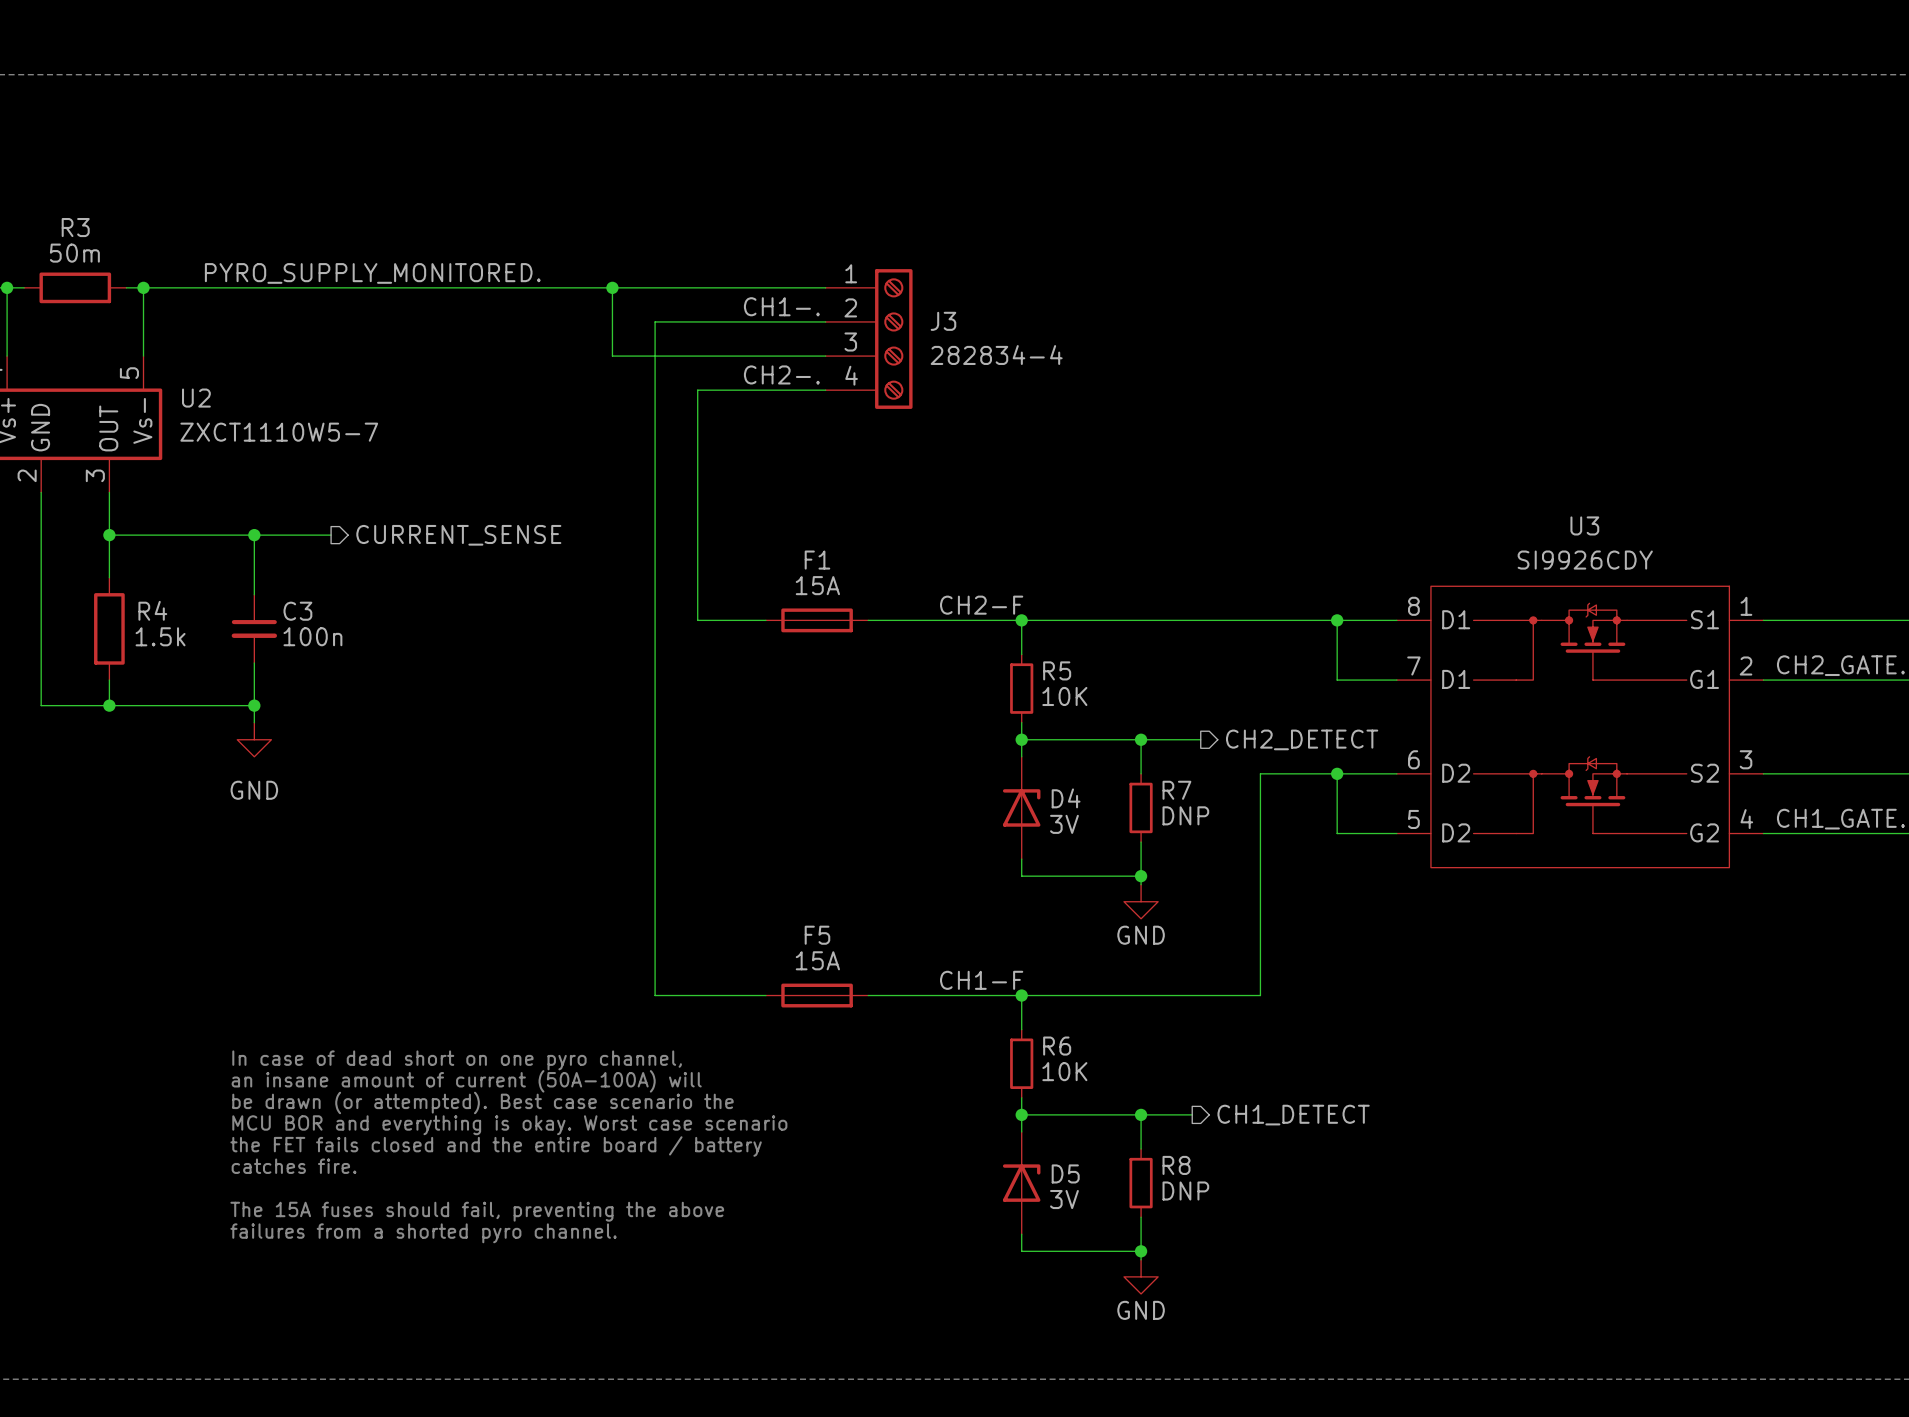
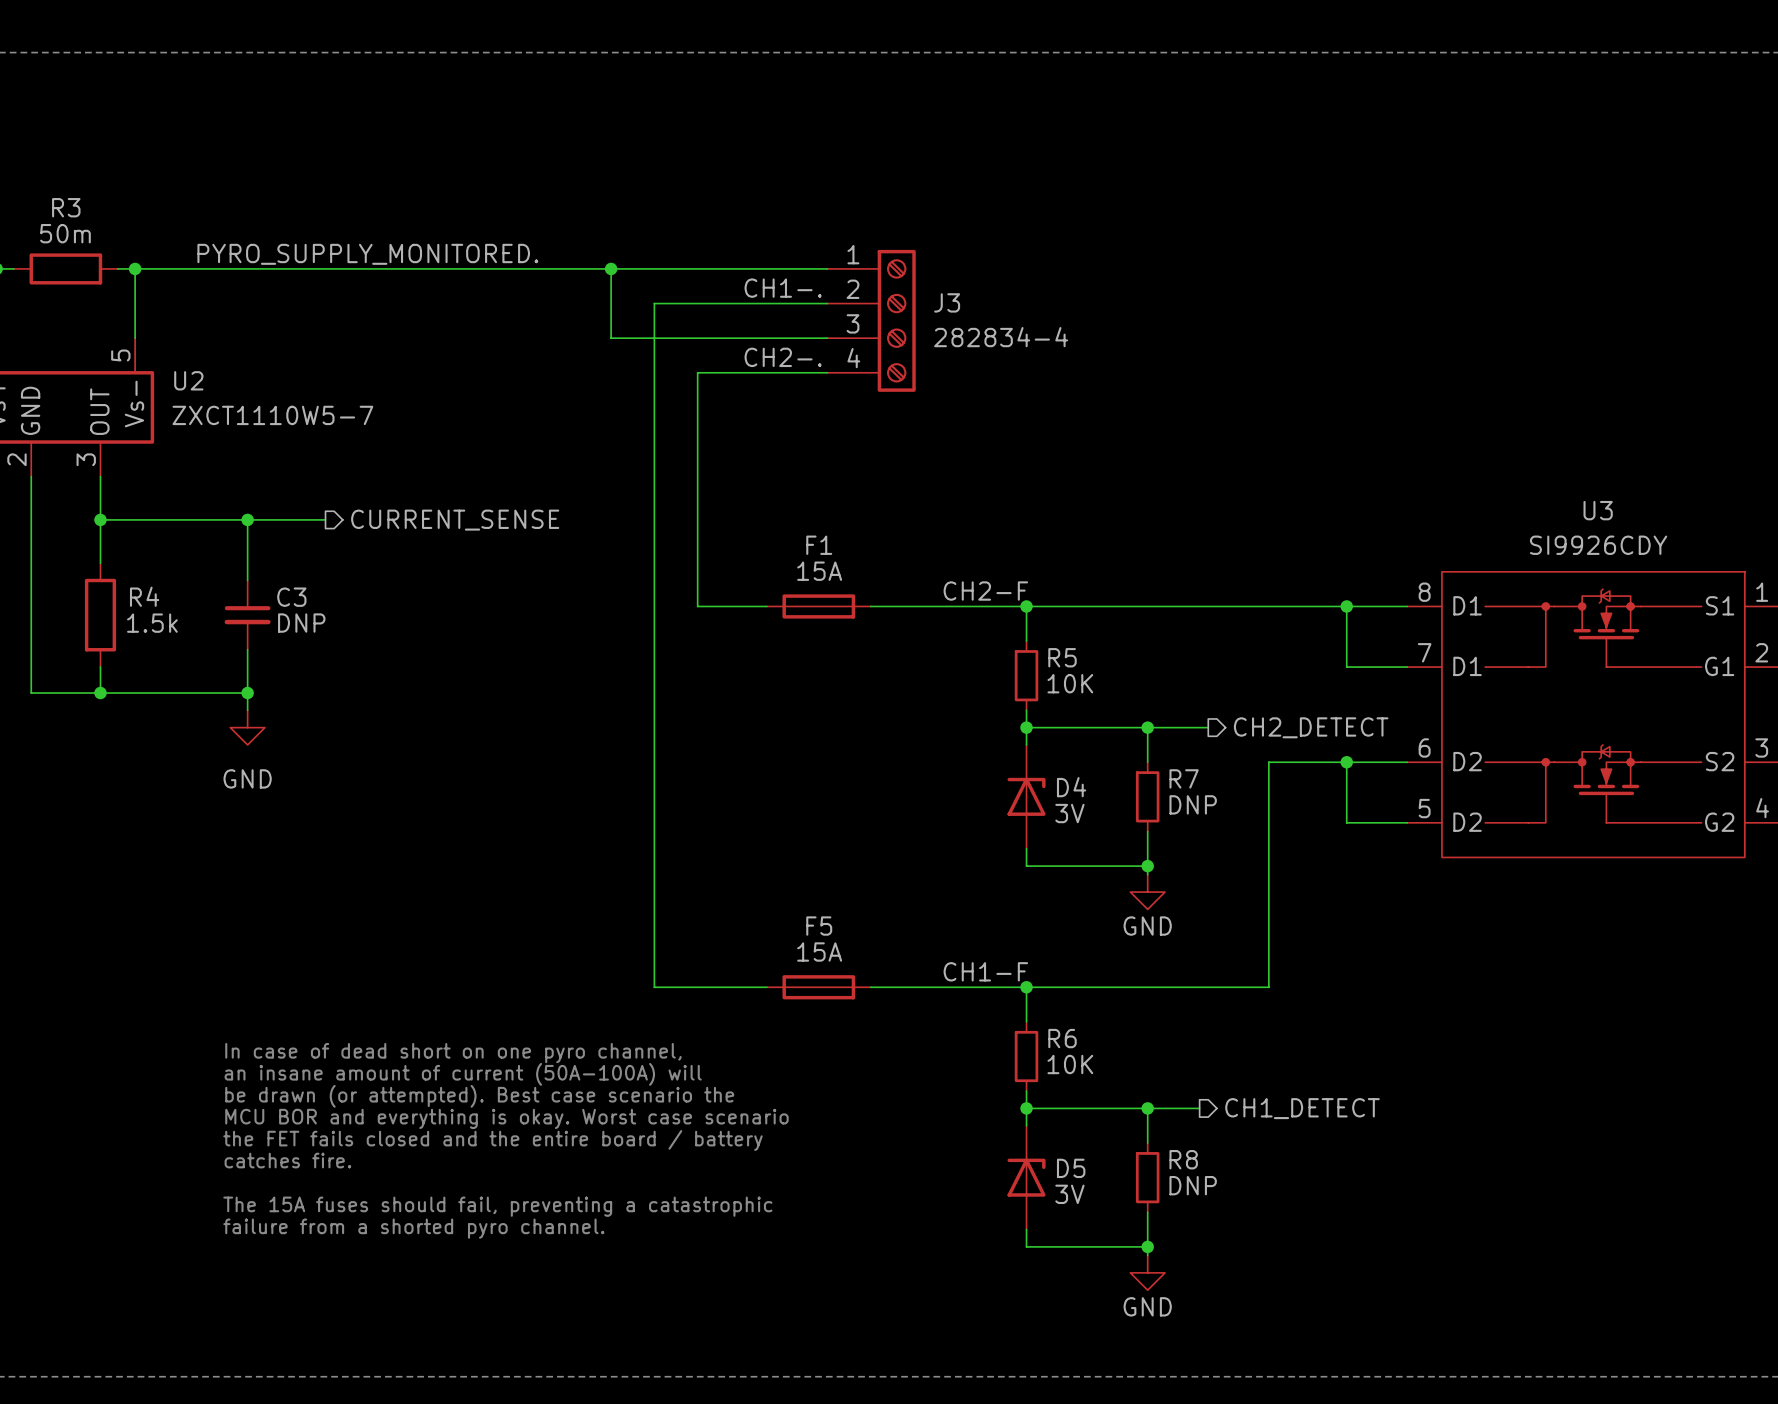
C3 value: 100n (312, 636) -> DNP (301, 623)
text: The 15A fuses should fail, preventing the above (477, 1211) -> The 15A fuses should fail, preventing a catastrophic (497, 1206)
text: failures from a shorted pyro channel. (423, 1233) -> failure from a shorted pyro channel. (413, 1228)

